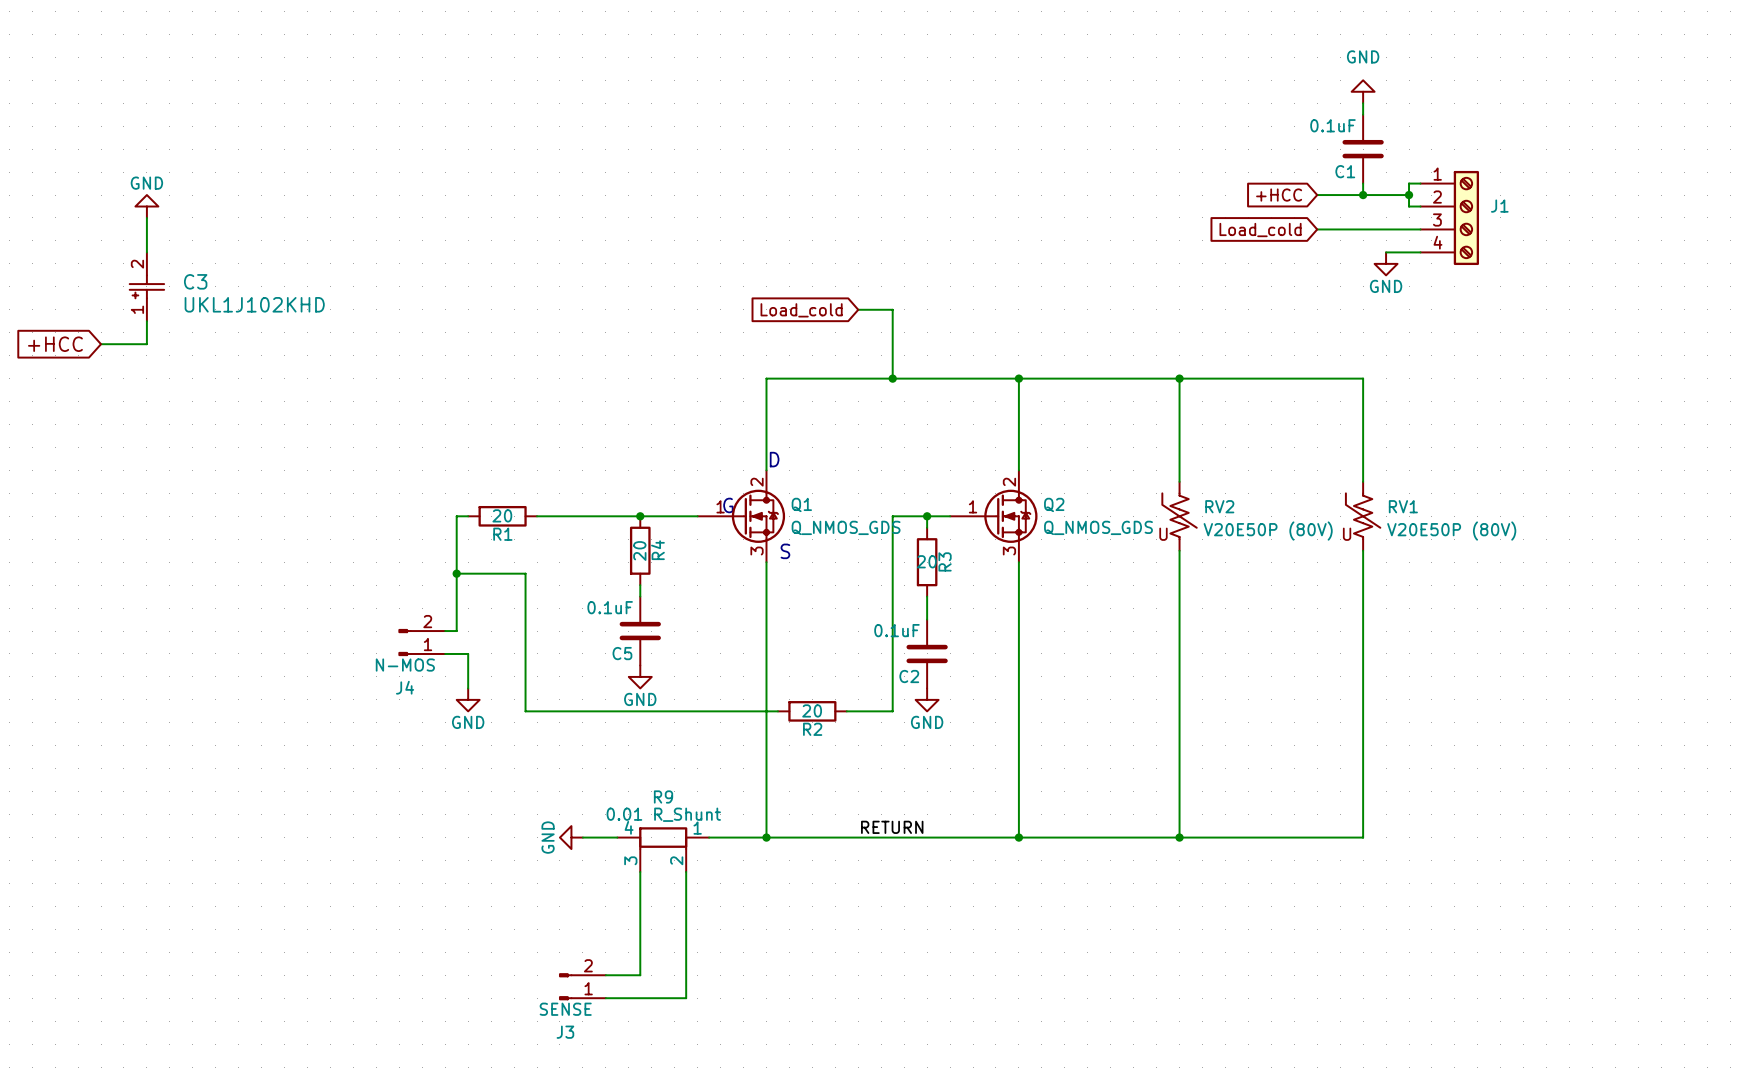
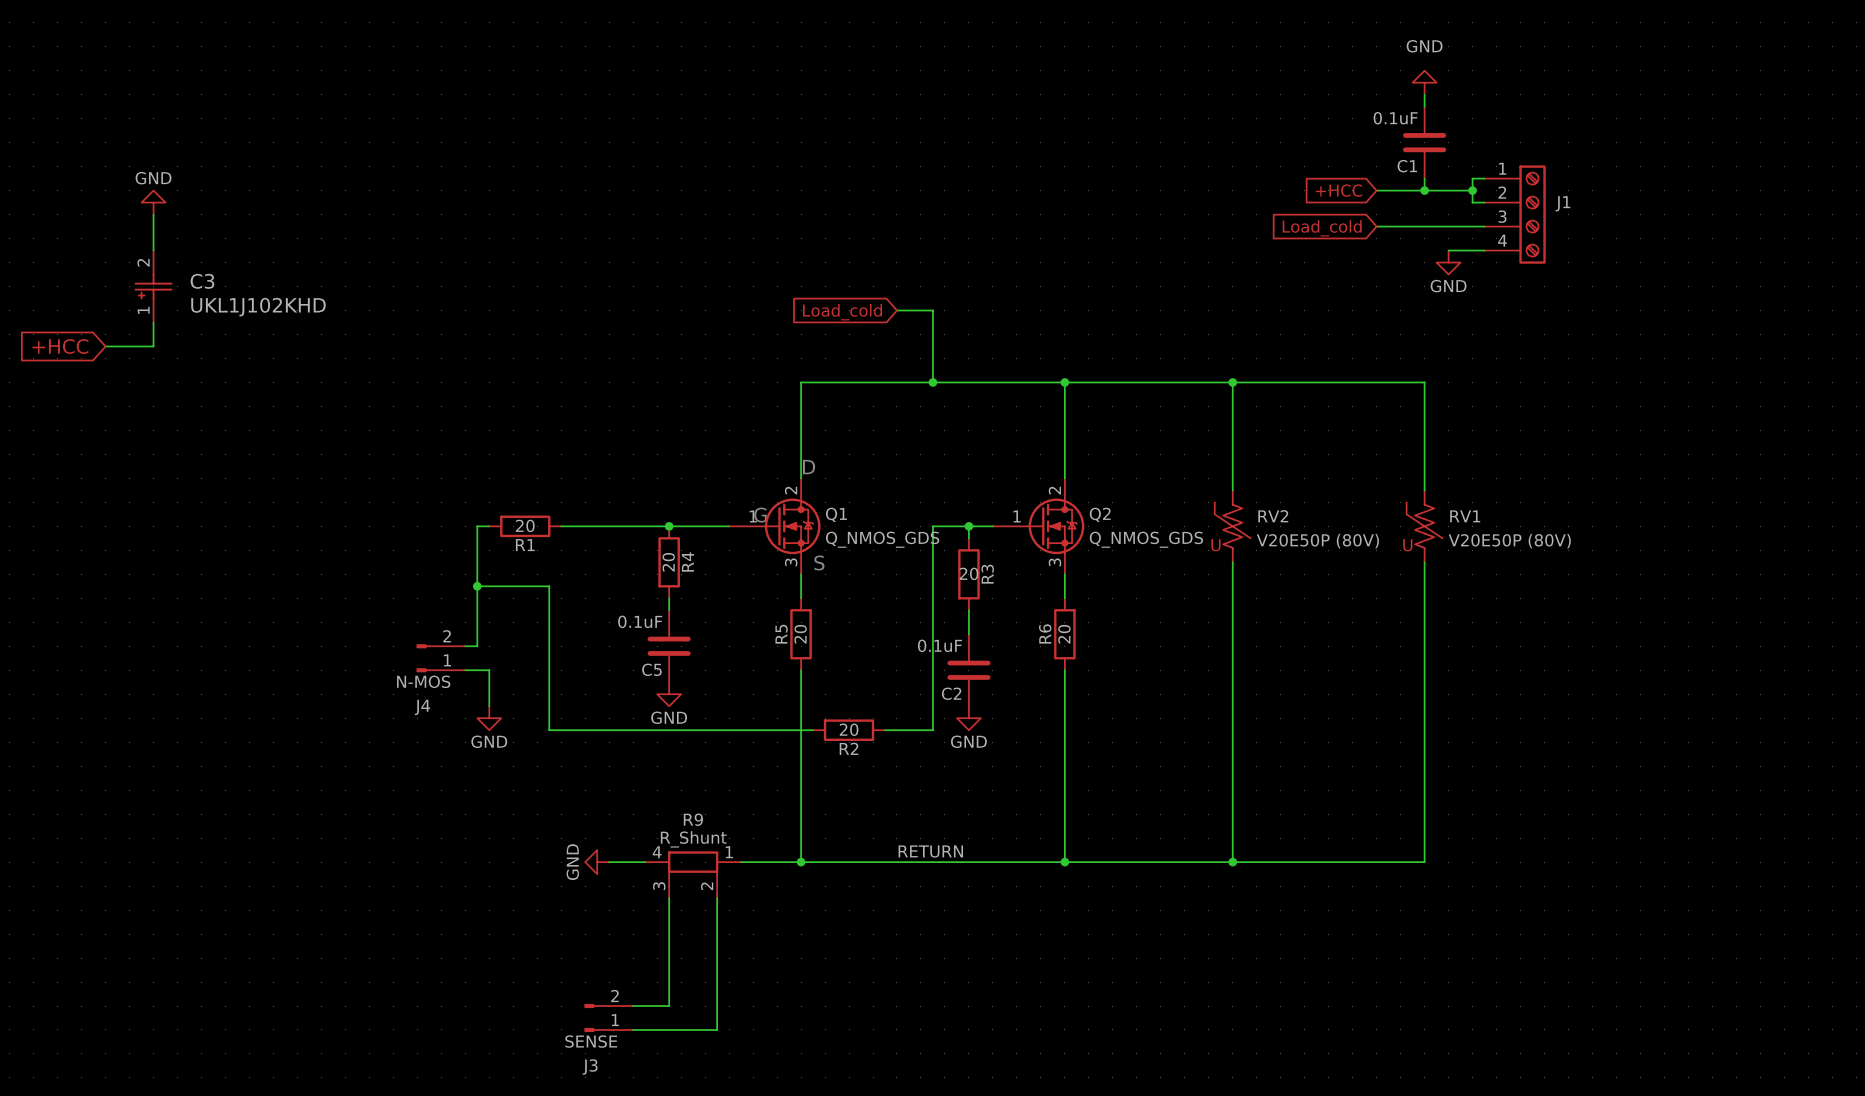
wire: (766, 585) (766, 653) -> none
wire: (1018, 585) (1018, 653) -> none
R5: none -> 20 (801, 634)
R6: none -> 20 (1064, 634)
R9 value: 0.01 R_Shunt (663, 814) -> R_Shunt (693, 839)

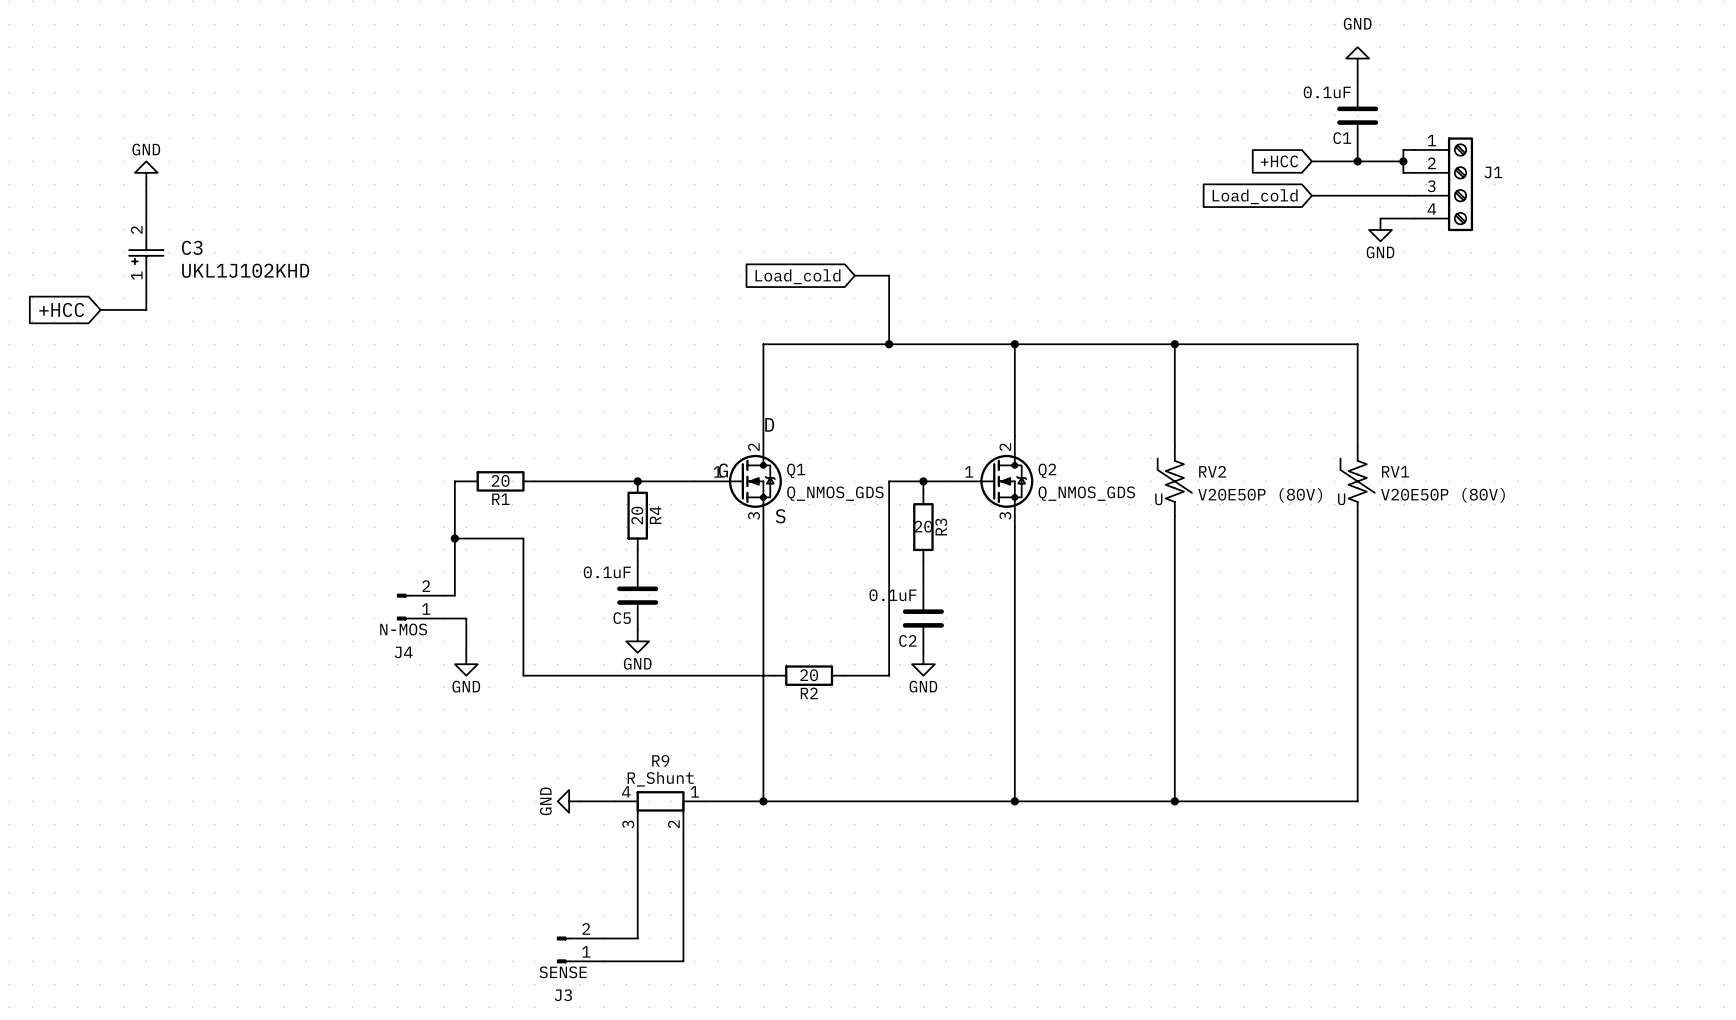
wire: none -> (763, 549) (763, 618)
wire: none -> (1014, 549) (1014, 618)
R5: 20 (801, 634) -> none
R6: 20 (1064, 634) -> none
label: RETURN (930, 851) -> none

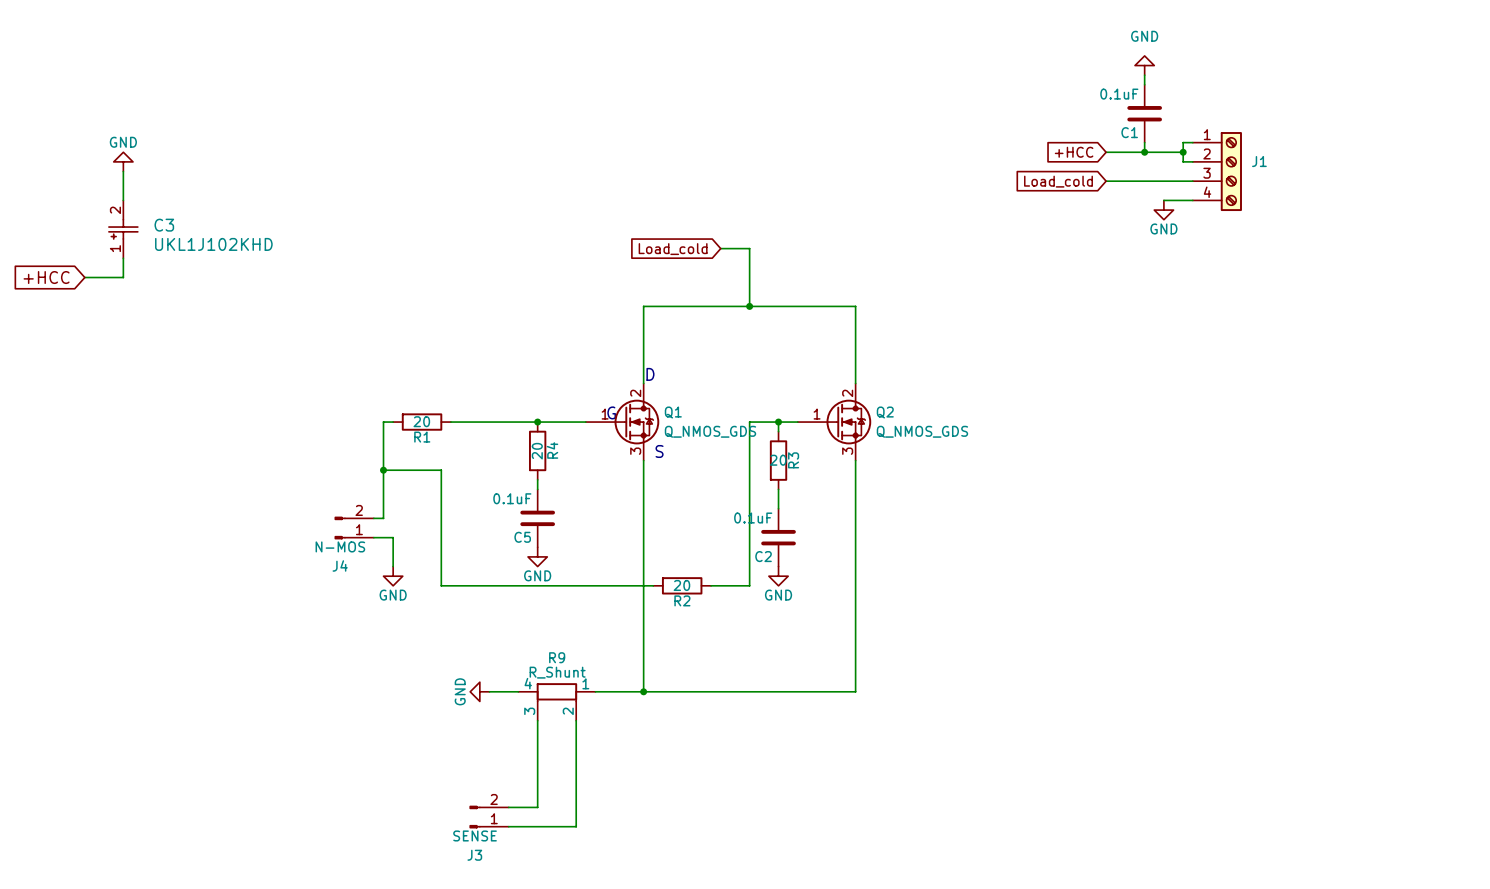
wire: (1014, 344) (1357, 344) (1357, 447) -> none
junction: (1014, 344) -> none
wire: (1174, 344) (1174, 447) -> none
junction: (1174, 344) -> none
RV2: V20E50P (80V) (1174, 481) -> none
RV1: V20E50P (80V) (1357, 481) -> none
wire: (1174, 515) (1174, 801) -> none
wire: (1357, 515) (1357, 801) (1014, 801) -> none
junction: (1014, 801) -> none
junction: (1174, 801) -> none

